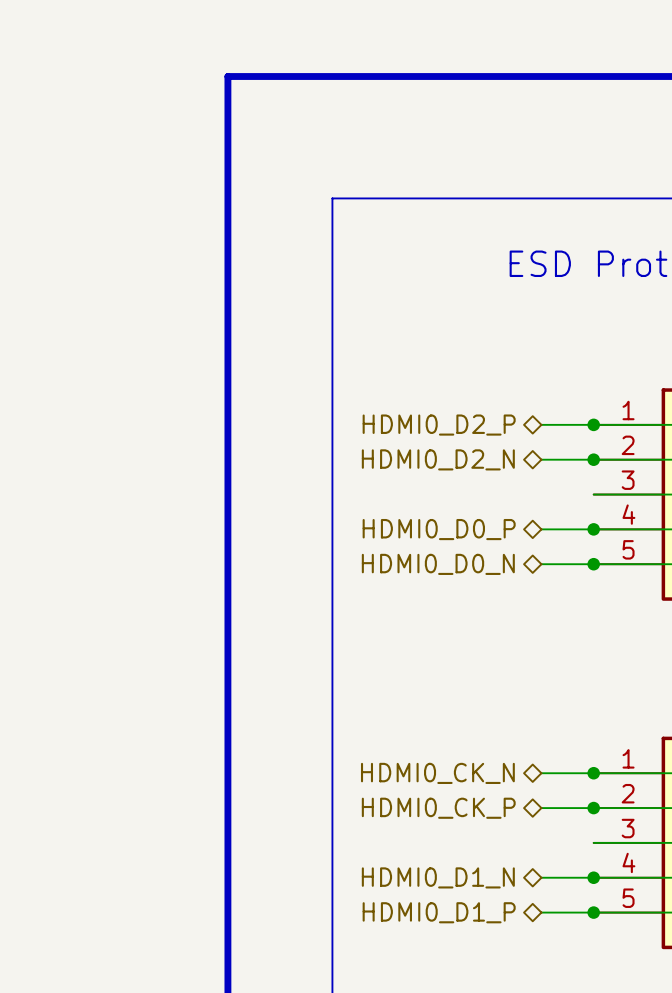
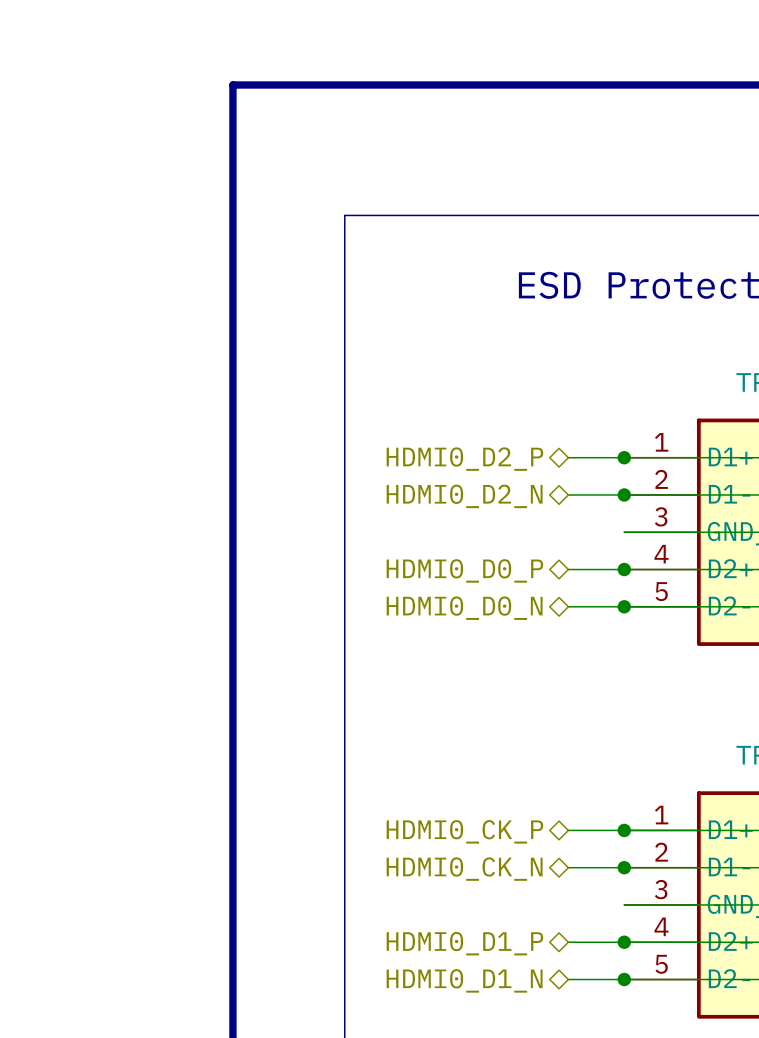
hierarchical label: HDMI0_CK_N (437, 773) -> HDMI0_CK_P (464, 831)
hierarchical label: HDMI0_CK_P (438, 808) -> HDMI0_CK_N (464, 869)
hierarchical label: HDMI0_D1_N (438, 877) -> HDMI0_D1_P (464, 943)
hierarchical label: HDMI0_D1_P (439, 912) -> HDMI0_D1_N (464, 980)

